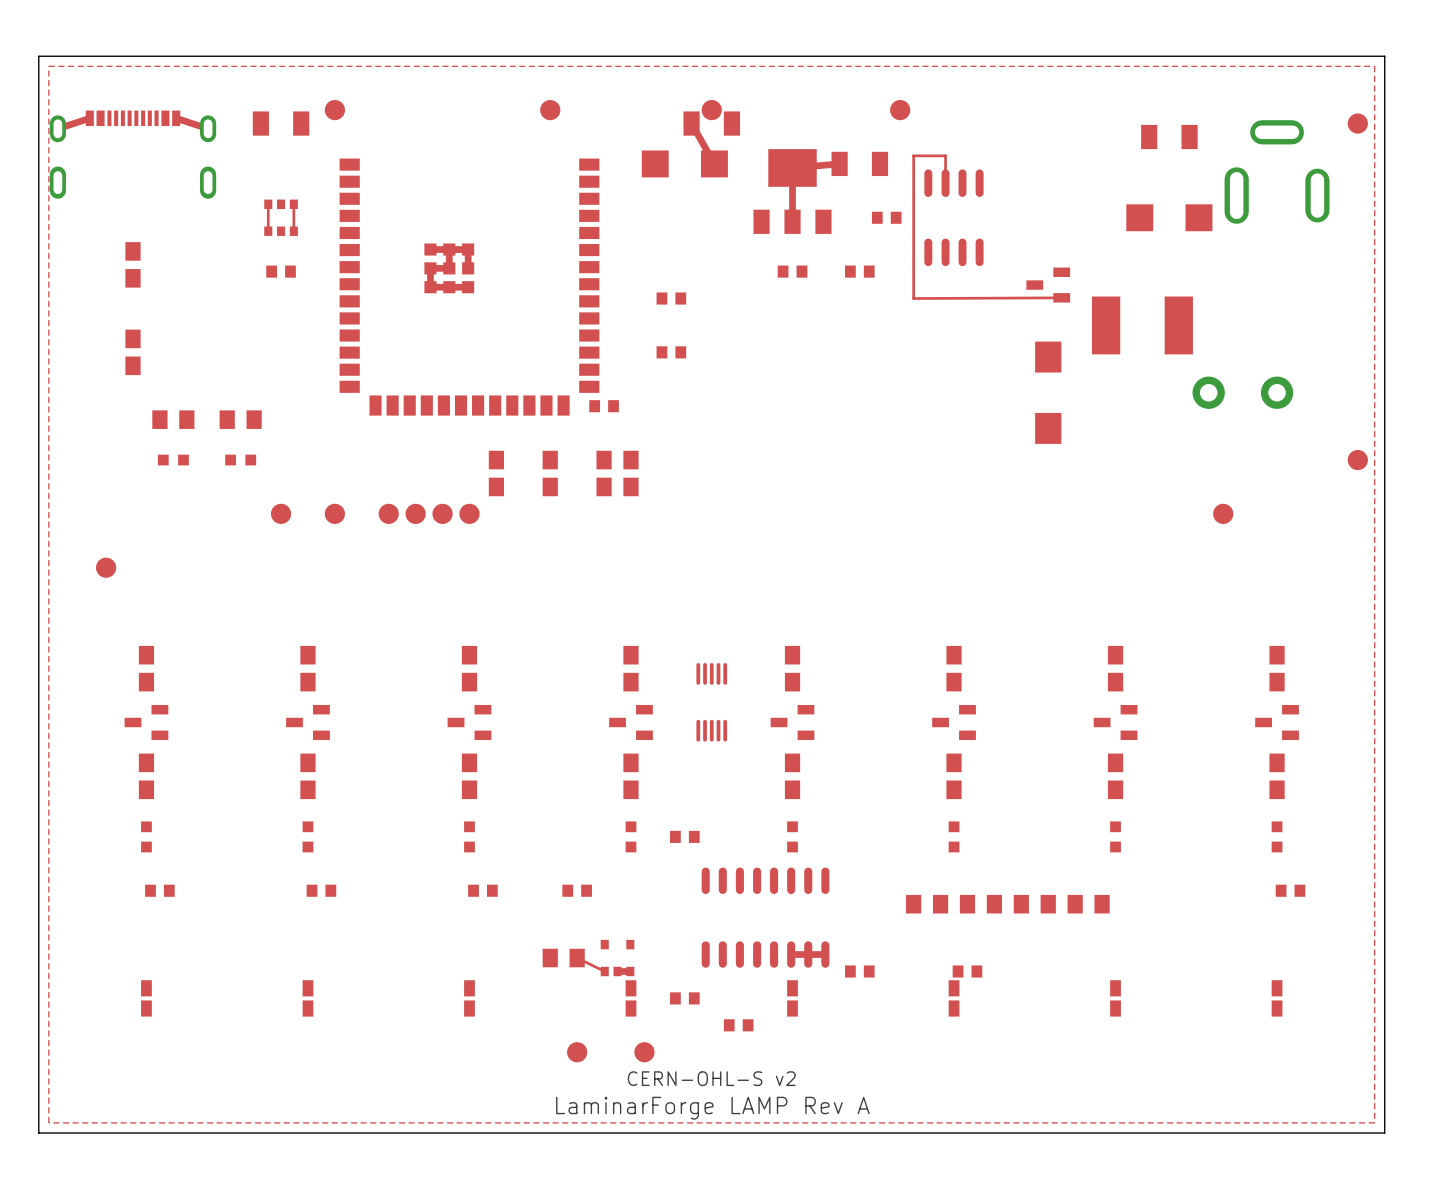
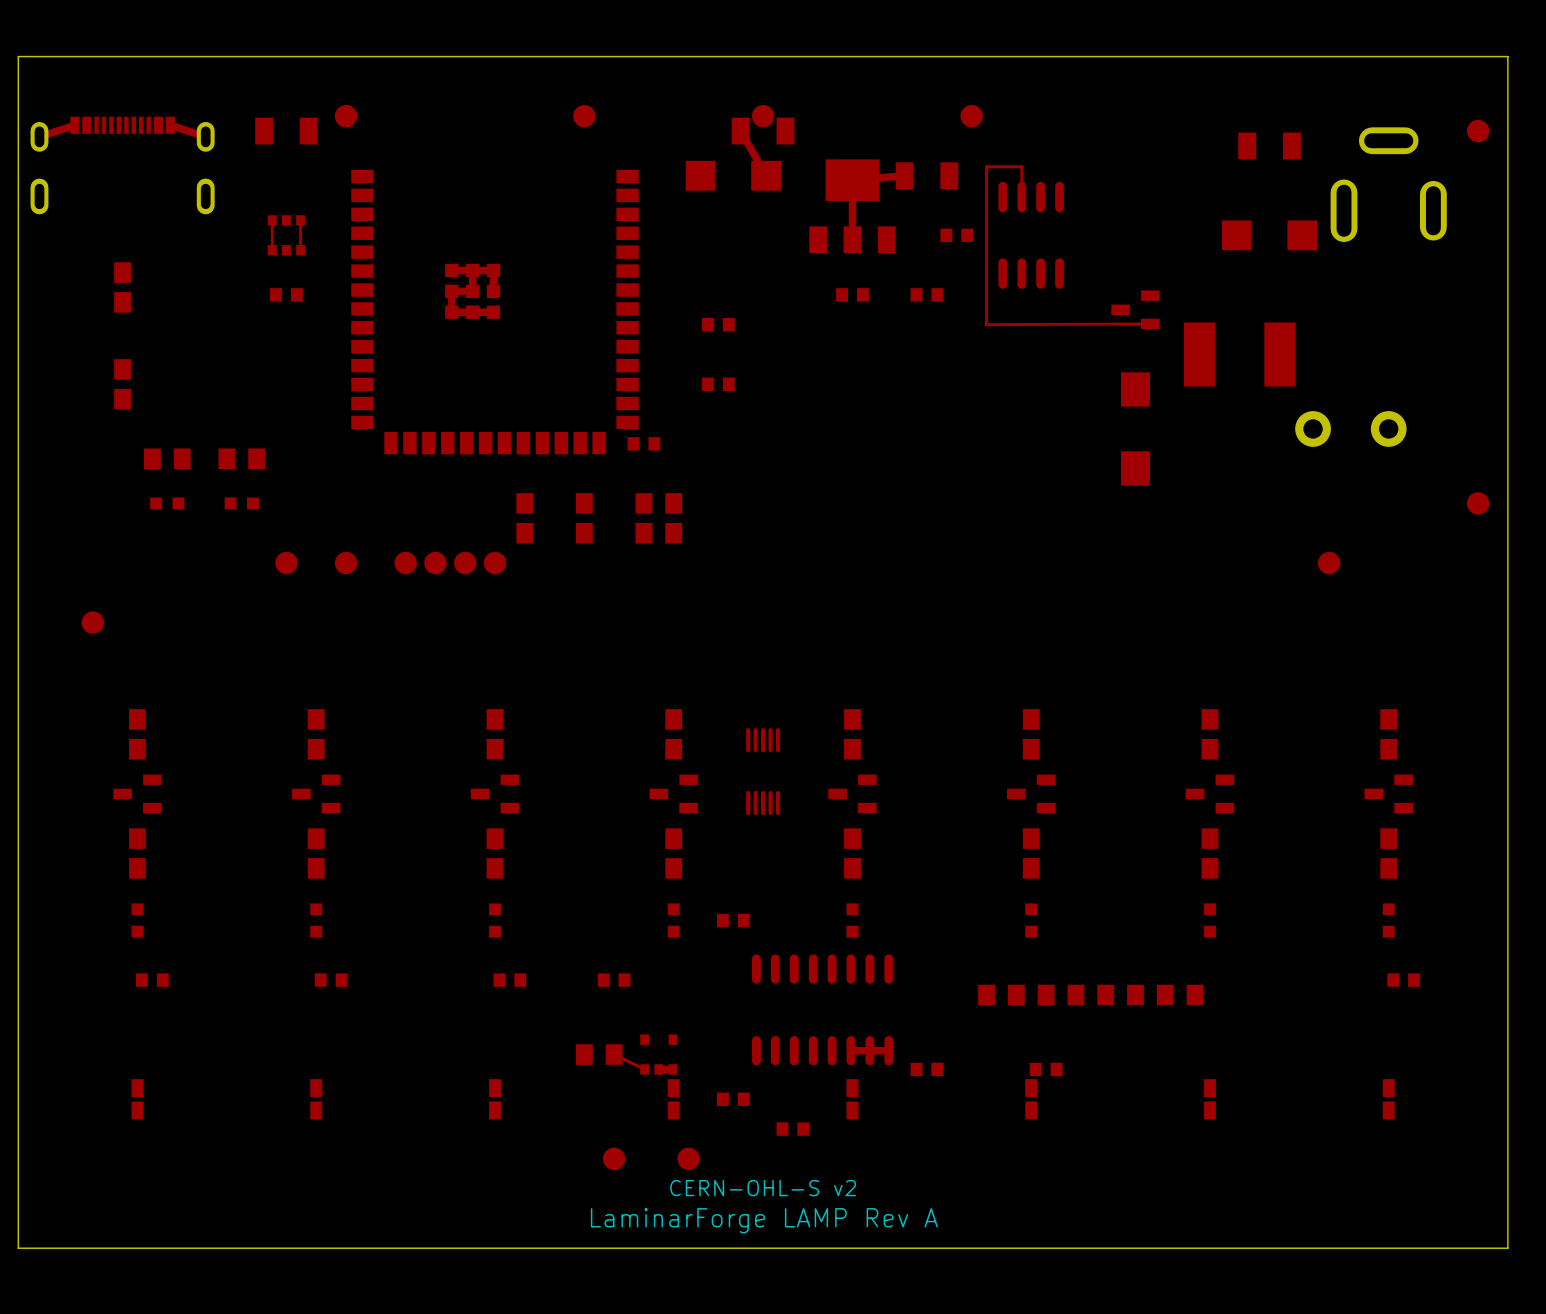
zone outline: (48, 66) (1374, 66) (1374, 1122) (48, 1122) (48, 66) -> none

